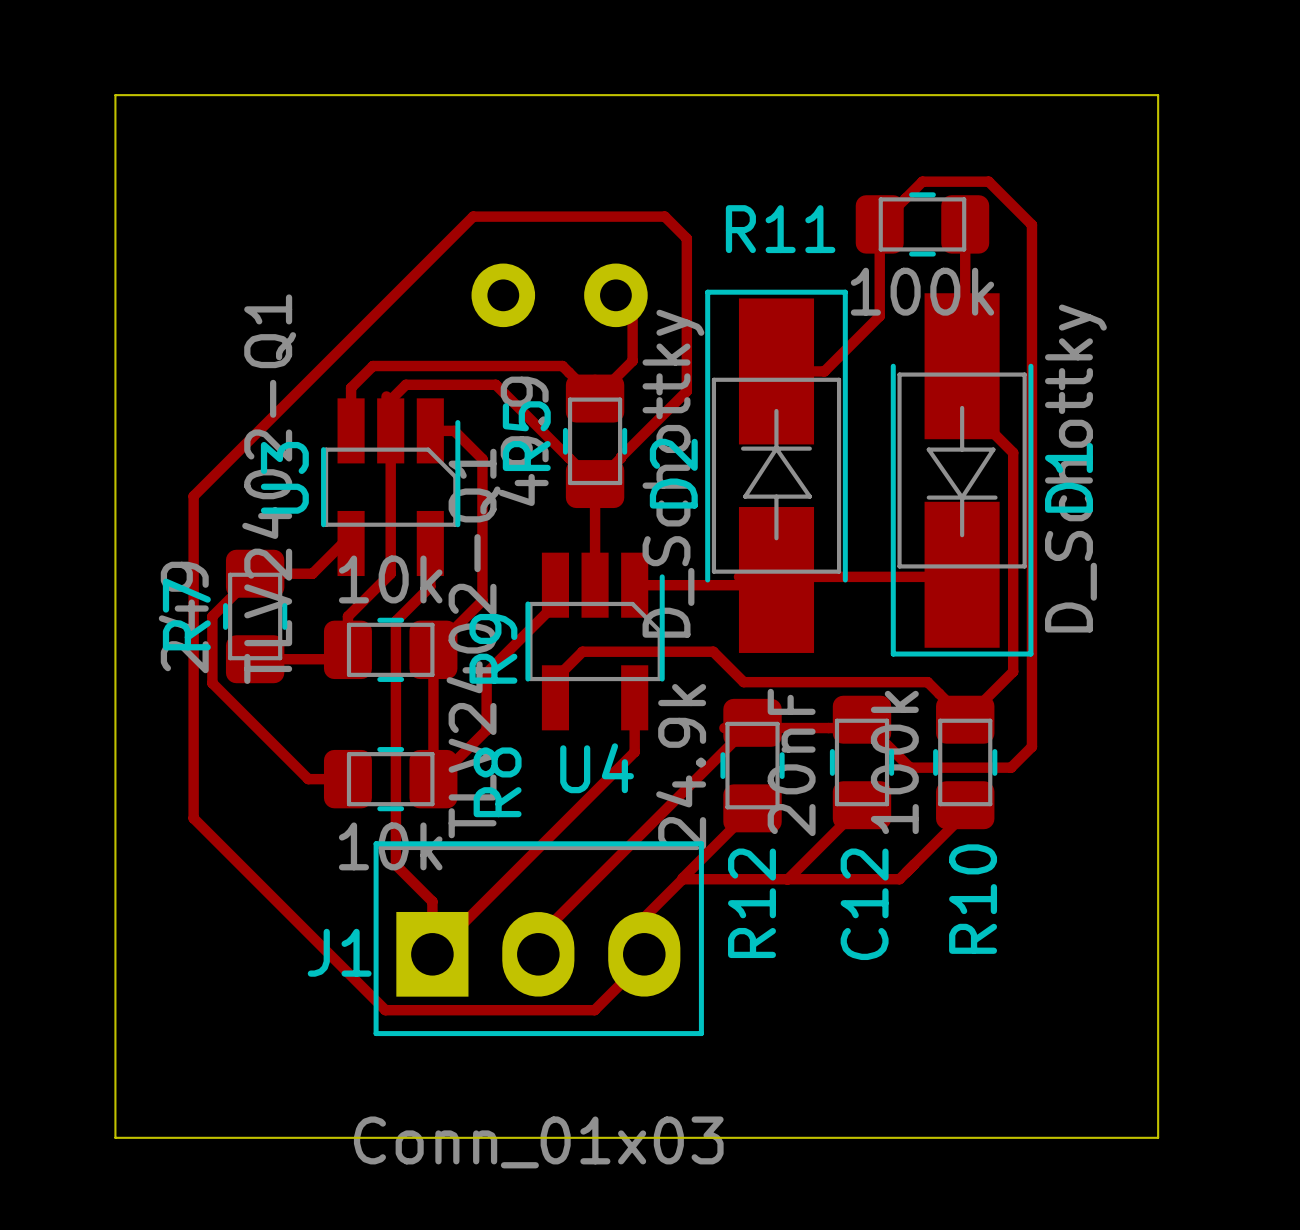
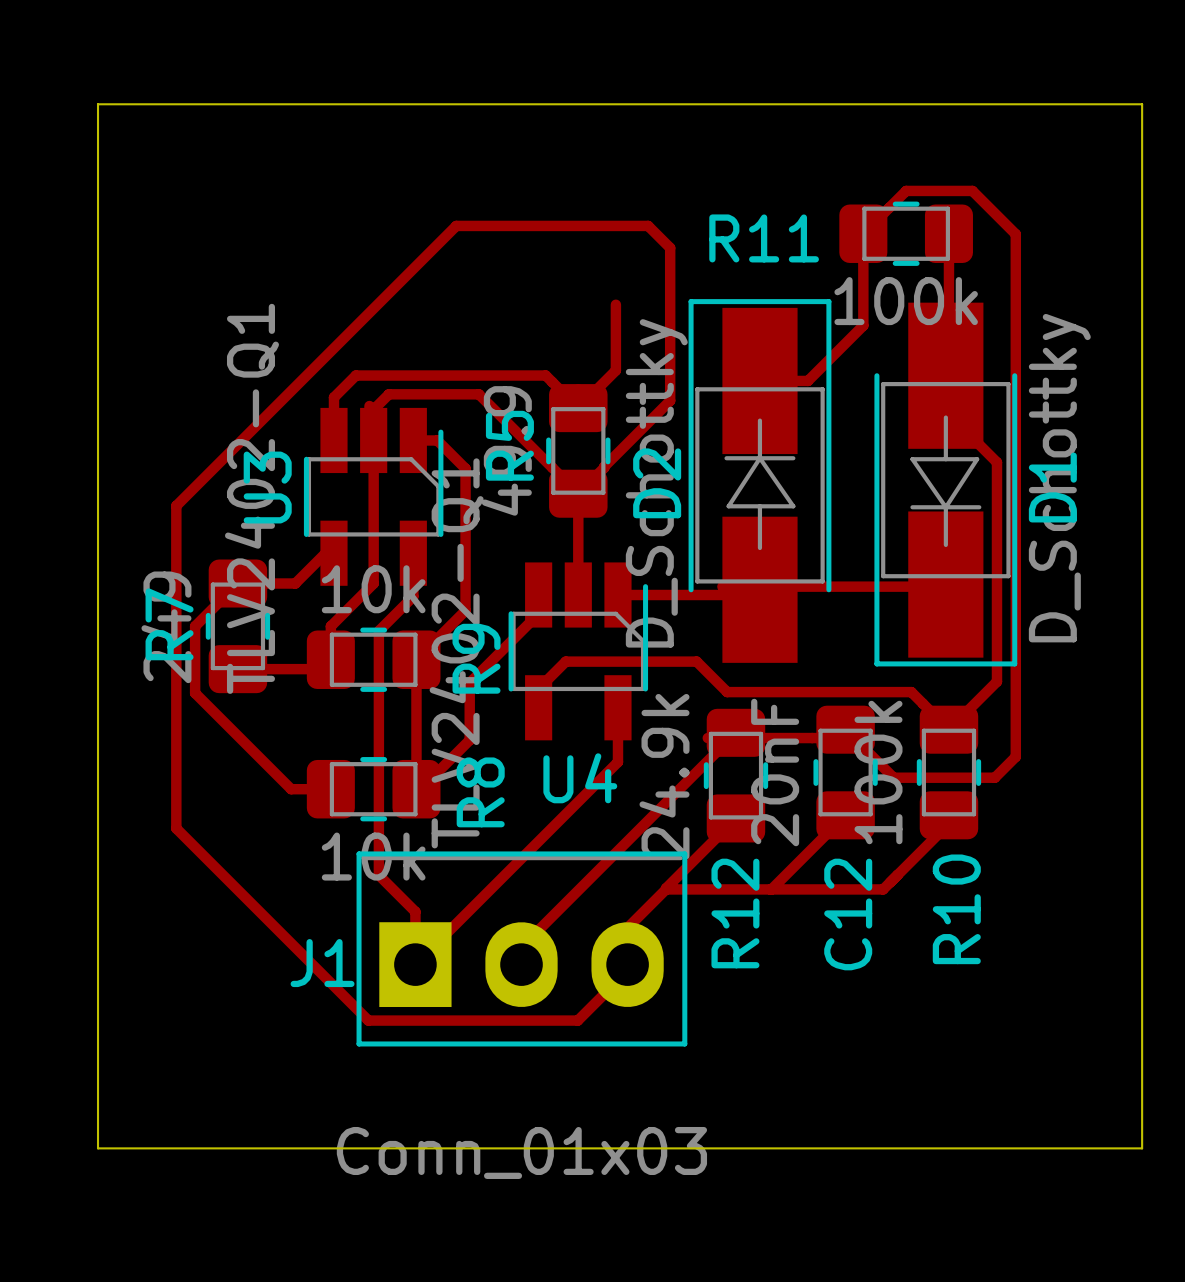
part: (559, 295) -> none

